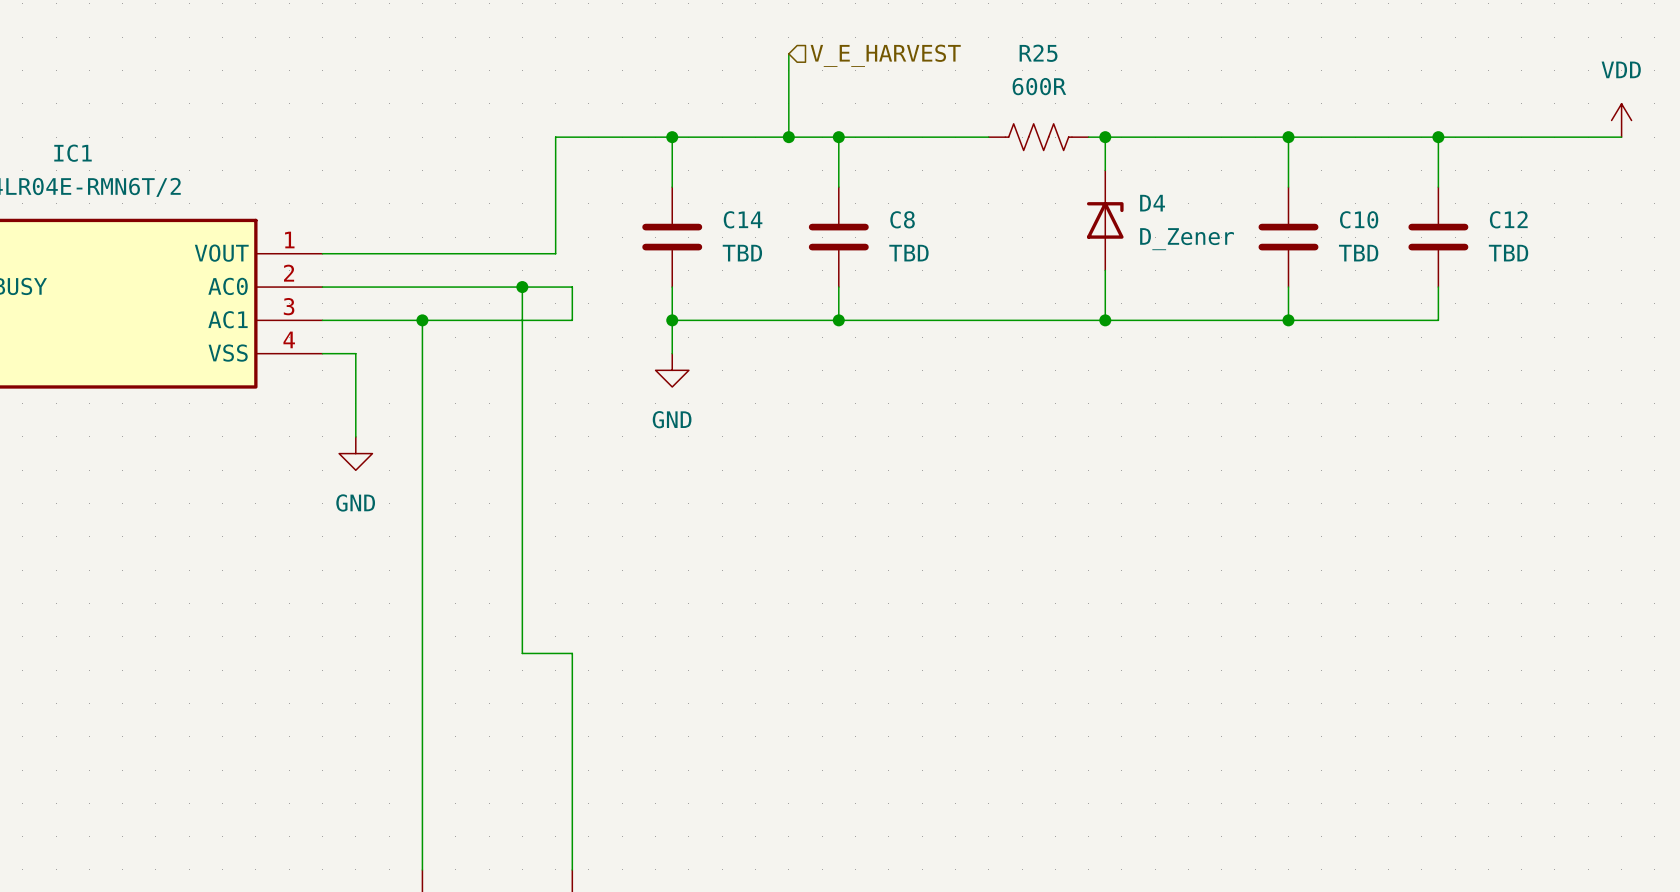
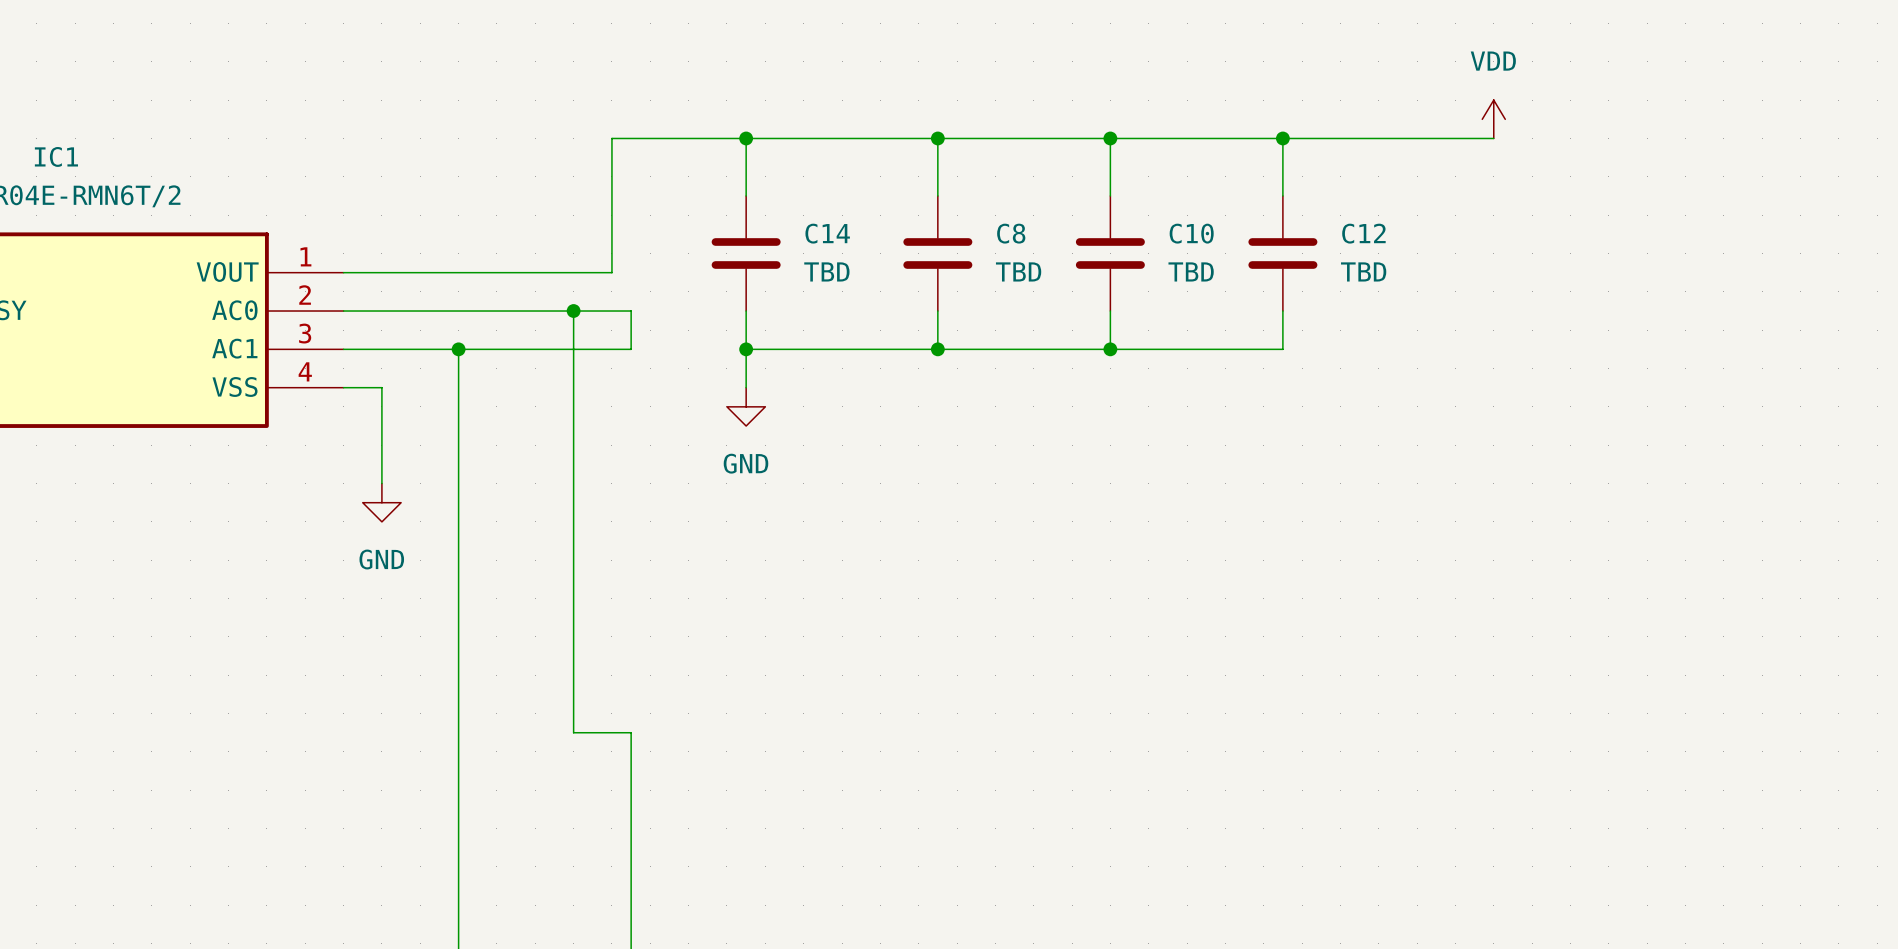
wire: (788, 53) (788, 137) -> none
hierarchical label: V_E_HARVEST (885, 55) -> none
power symbol position: VDD (1621, 120) -> VDD (1493, 119)
junction: (788, 137) -> none
junction: none -> (1110, 138)
R25: 600R (1038, 137) -> none
wire: none -> (1225, 138) (1110, 138) (1110, 195)
wire: (1105, 137) (1105, 170) -> none
junction position: (1105, 137) -> (1282, 138)
wire: (1288, 137) (1288, 187) -> (1282, 138) (1282, 195)
junction: (1288, 137) -> none
wire: (1321, 137) (1621, 137) -> none
wire: (1438, 137) (1438, 187) -> none
junction: (1438, 137) -> none
D4: D_Zener (1105, 220) -> none
C10 position: (1288, 237) -> (1110, 253)
C12 position: (1438, 237) -> (1282, 253)
wire: (1105, 270) (1105, 320) -> none
wire: (1288, 287) (1288, 320) -> (1110, 311) (1110, 349)
wire: (1438, 287) (1438, 320) (1138, 320) -> (1282, 311) (1282, 349)
junction: none -> (1110, 349)
junction: (1105, 320) -> none
junction: (1288, 320) -> none

